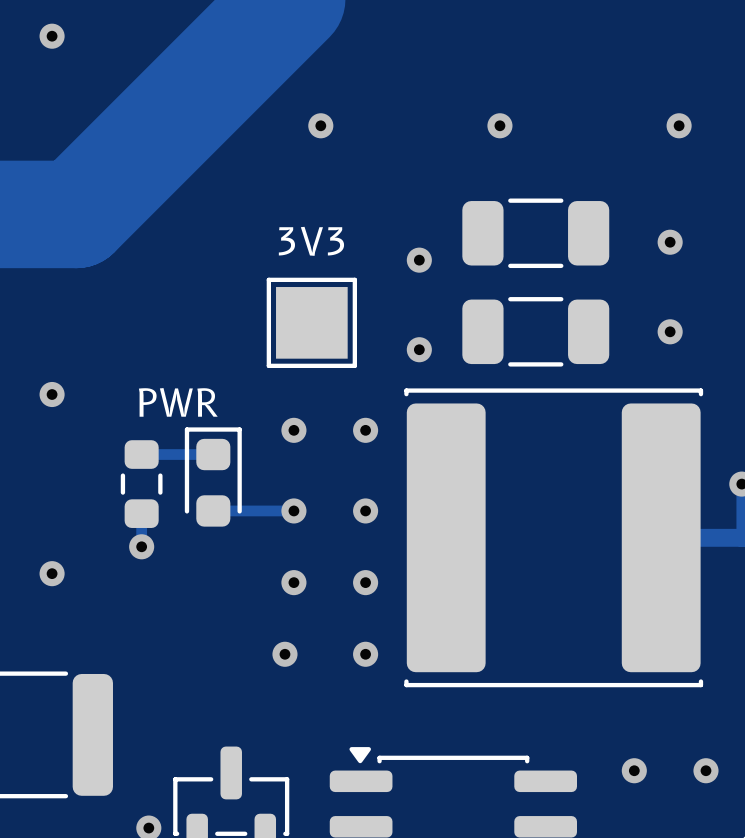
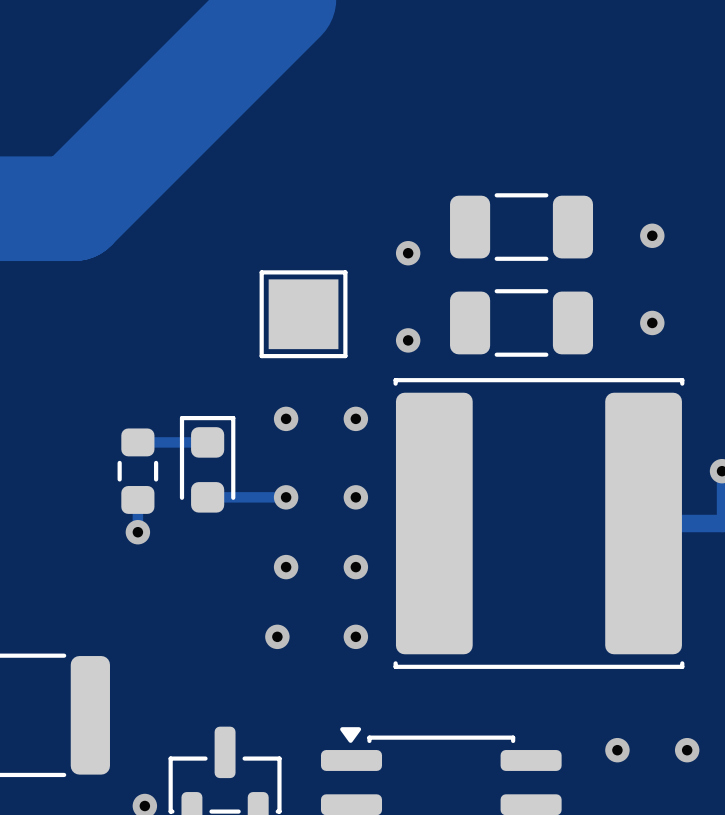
via: (52, 36) -> none
via: (320, 125) -> none
via: (499, 125) -> none
via: (679, 125) -> none
text: 3V3 (311, 241) -> none
via: (52, 394) -> none
text: PWR (178, 402) -> none
via: (52, 573) -> none

